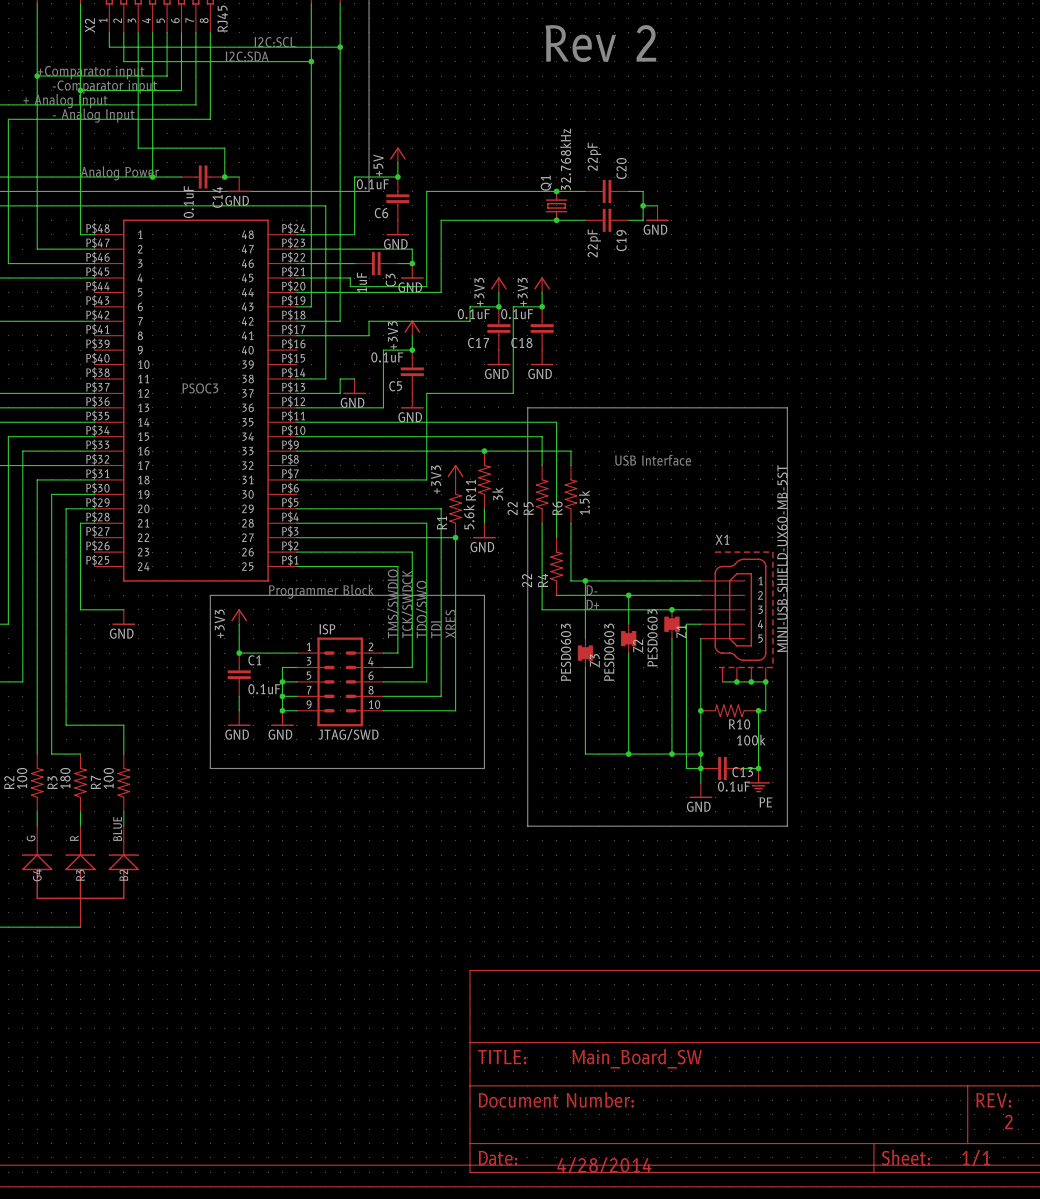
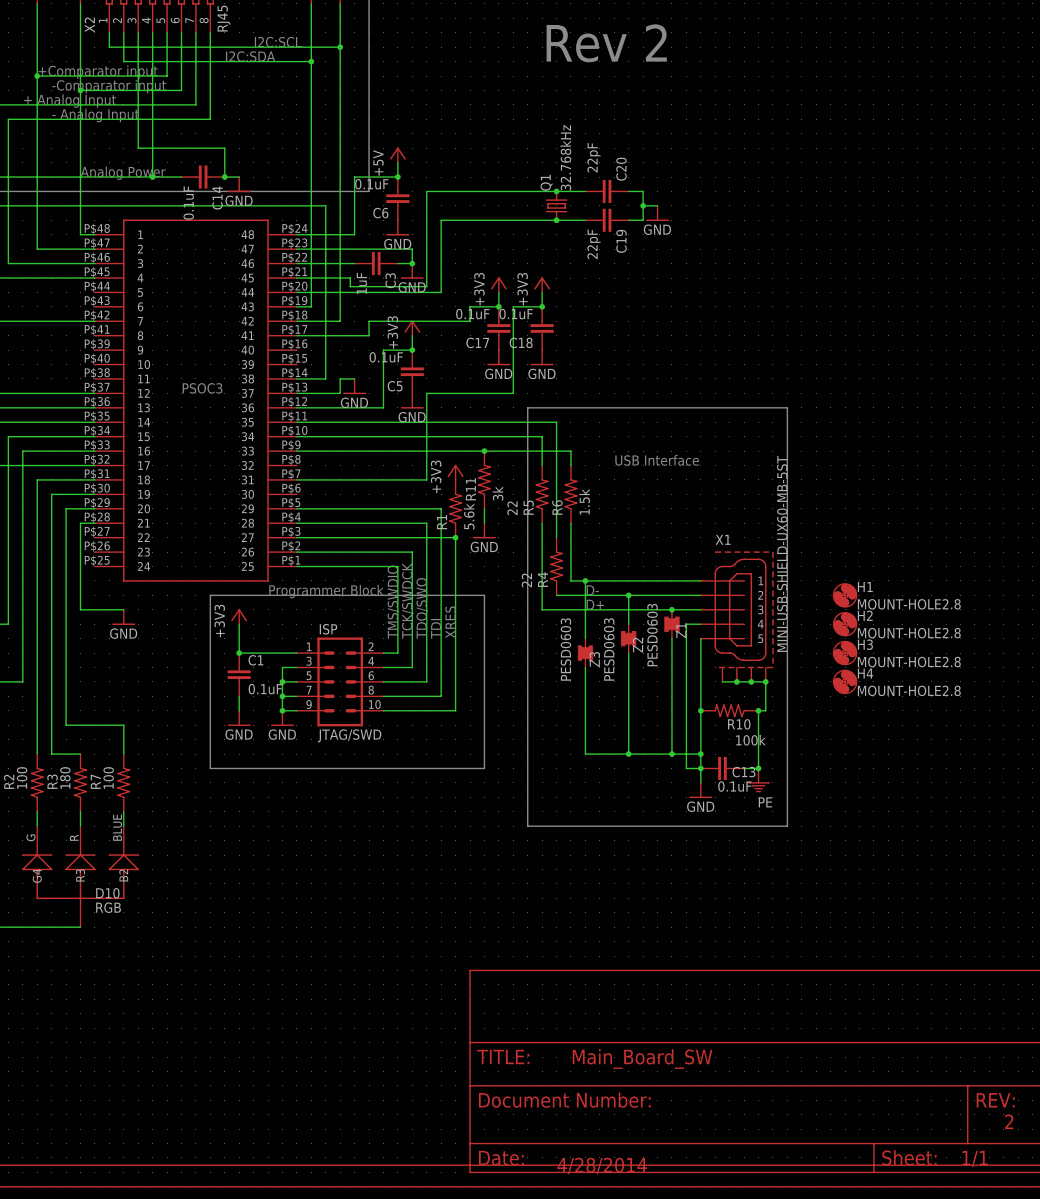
H1: none -> MOUNT-HOLE2.8 (845, 595)
H2: none -> MOUNT-HOLE2.8 (845, 624)
H3: none -> MOUNT-HOLE2.8 (845, 653)
H4: none -> MOUNT-HOLE2.8 (845, 681)
text: none -> D10 (107, 893)
text: none -> RGB (108, 907)

